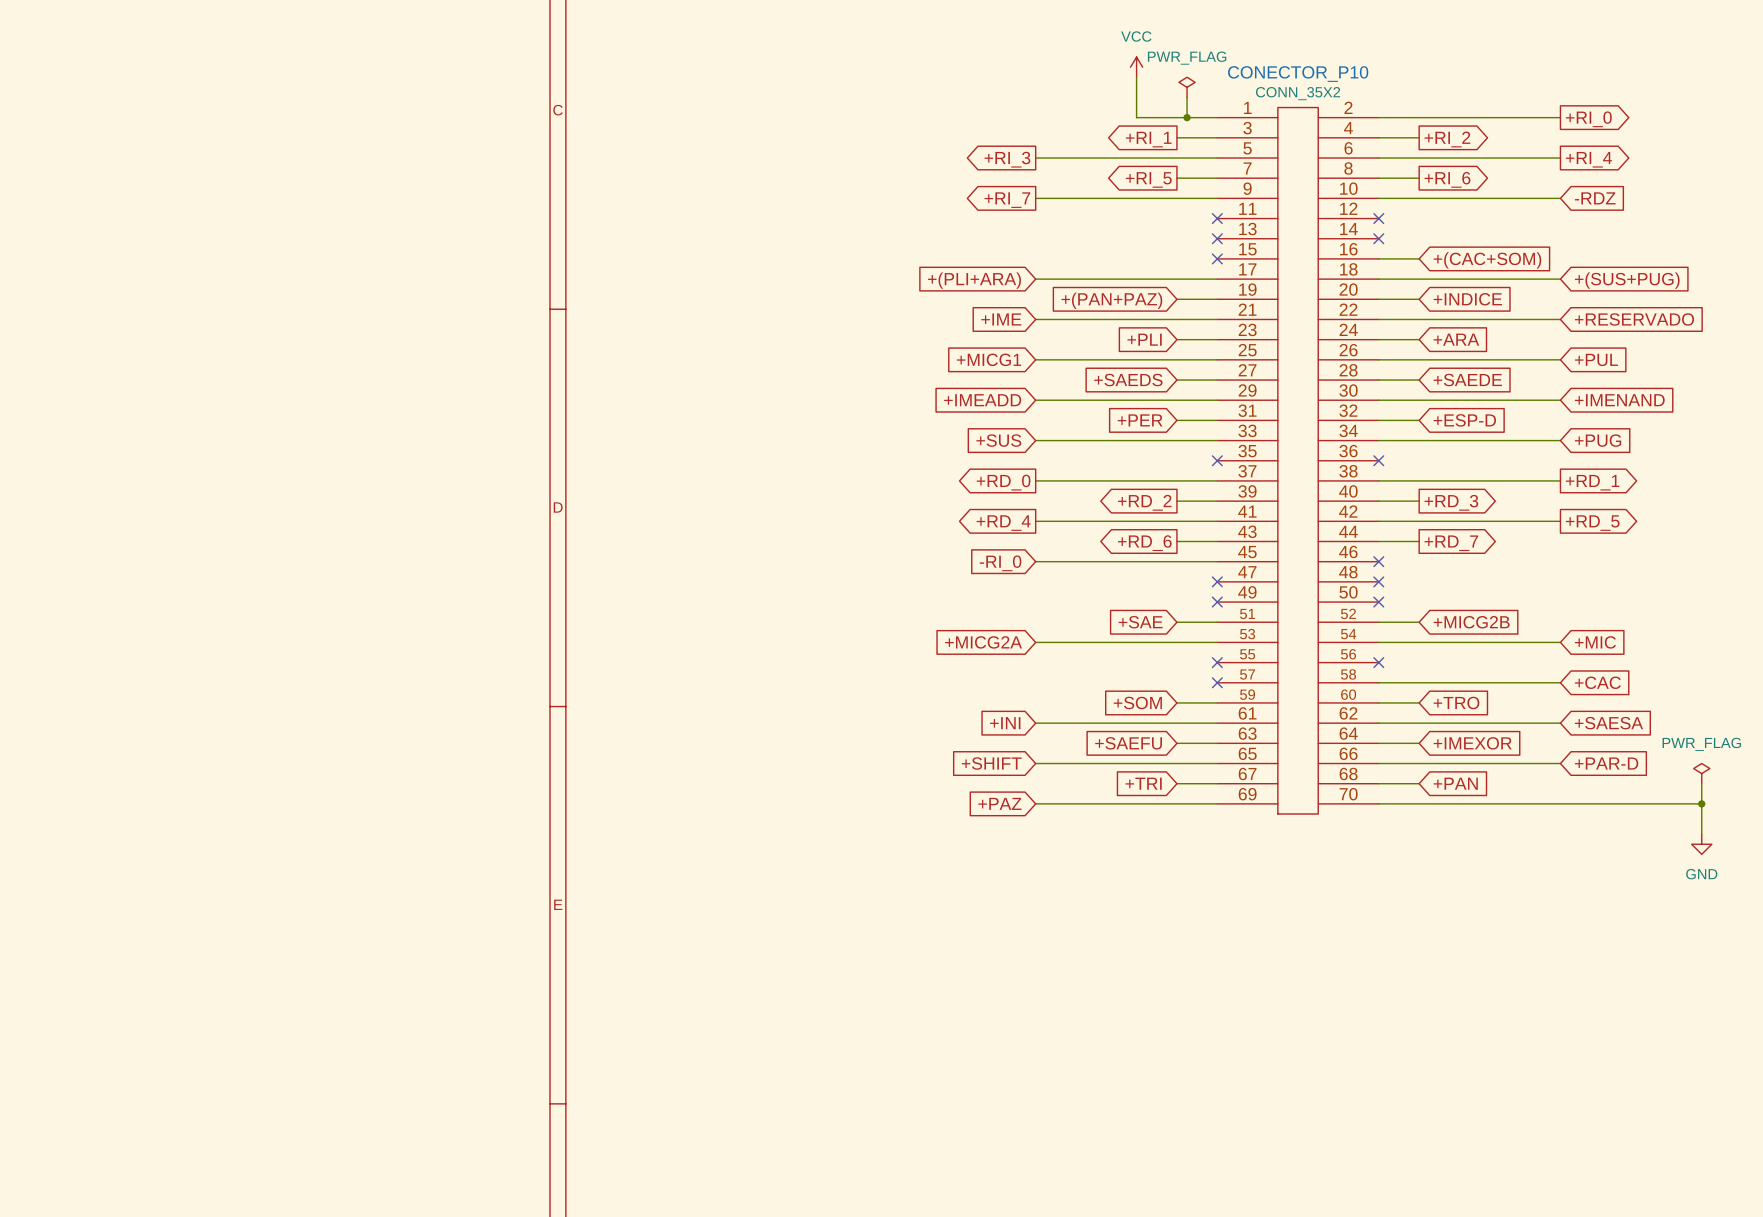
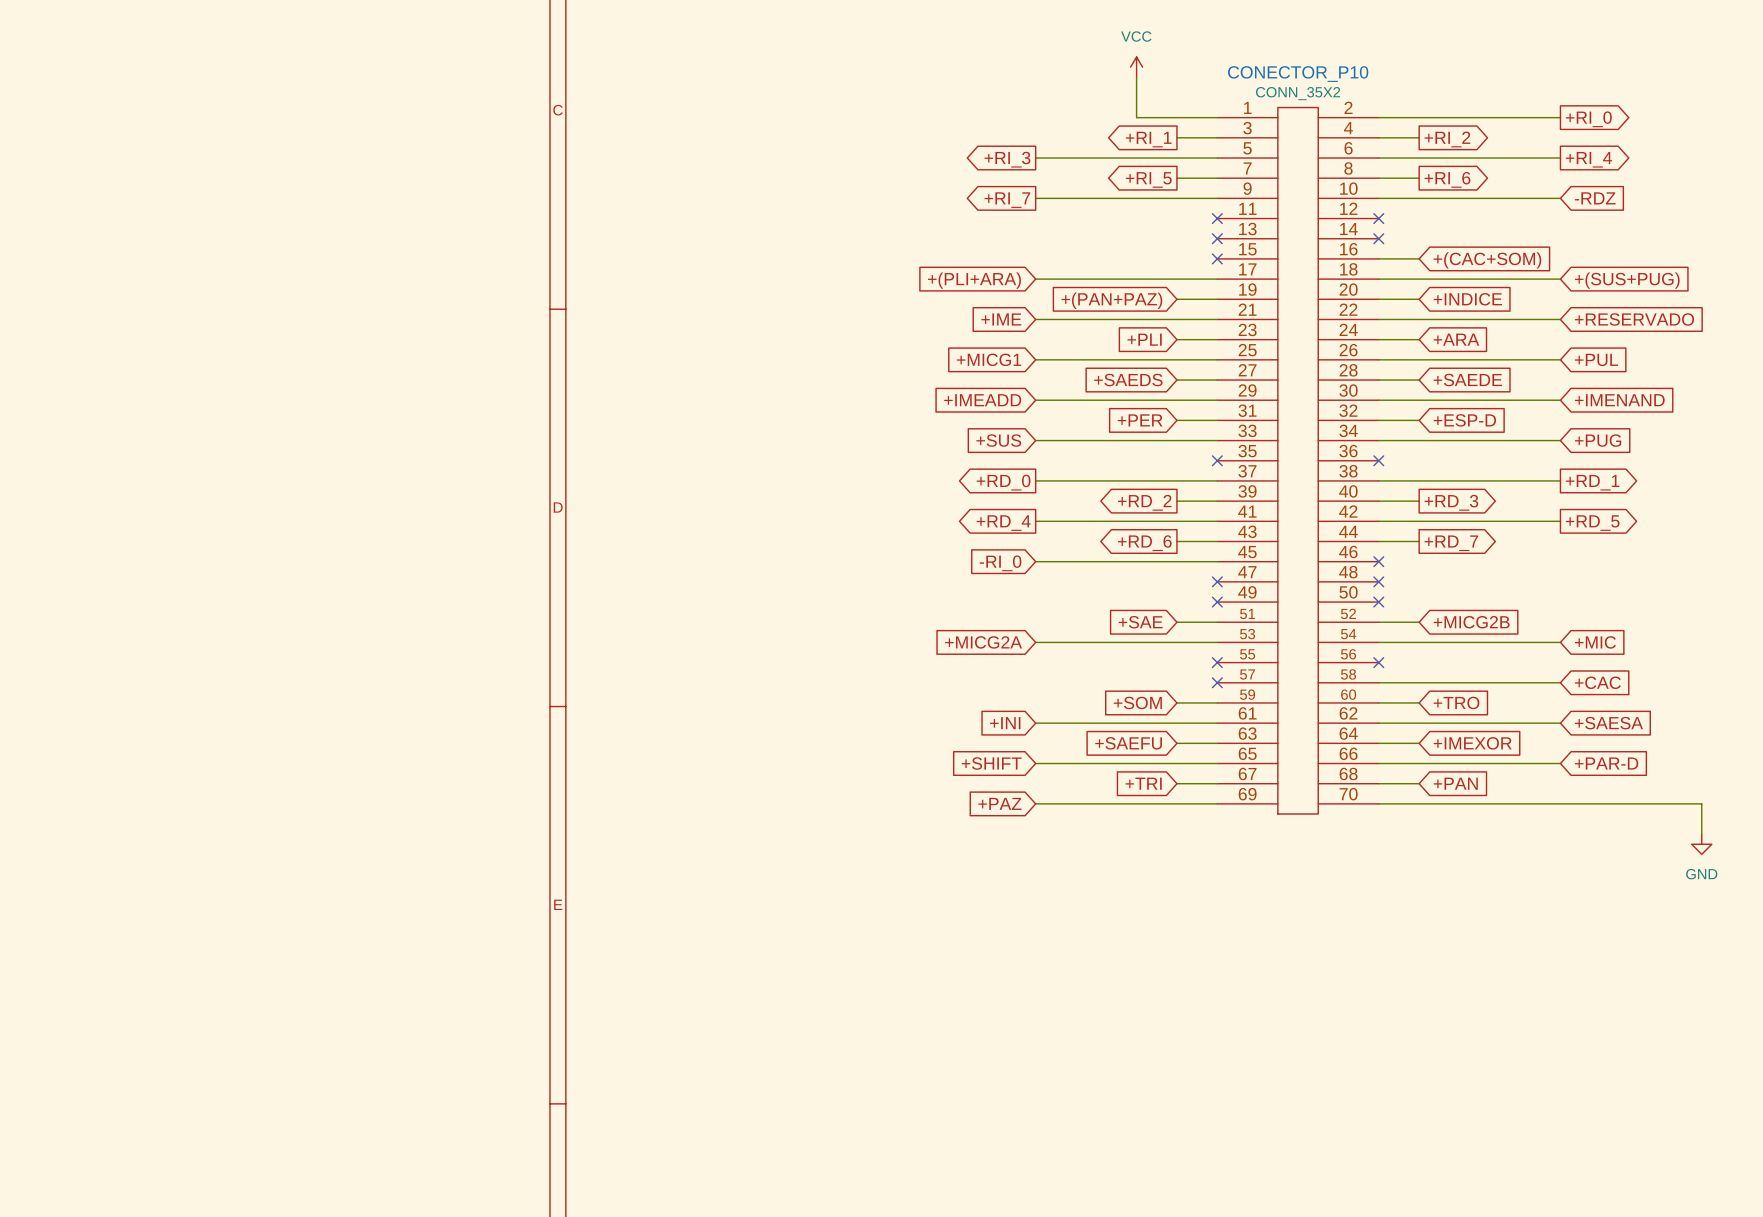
power symbol: PWR_FLAG (1187, 87) -> none
wire: (1187, 97) (1187, 117) -> none
junction: (1187, 117) -> none
power symbol: PWR_FLAG (1701, 773) -> none
wire: (1701, 783) (1701, 803) -> none
junction: (1701, 803) -> none

